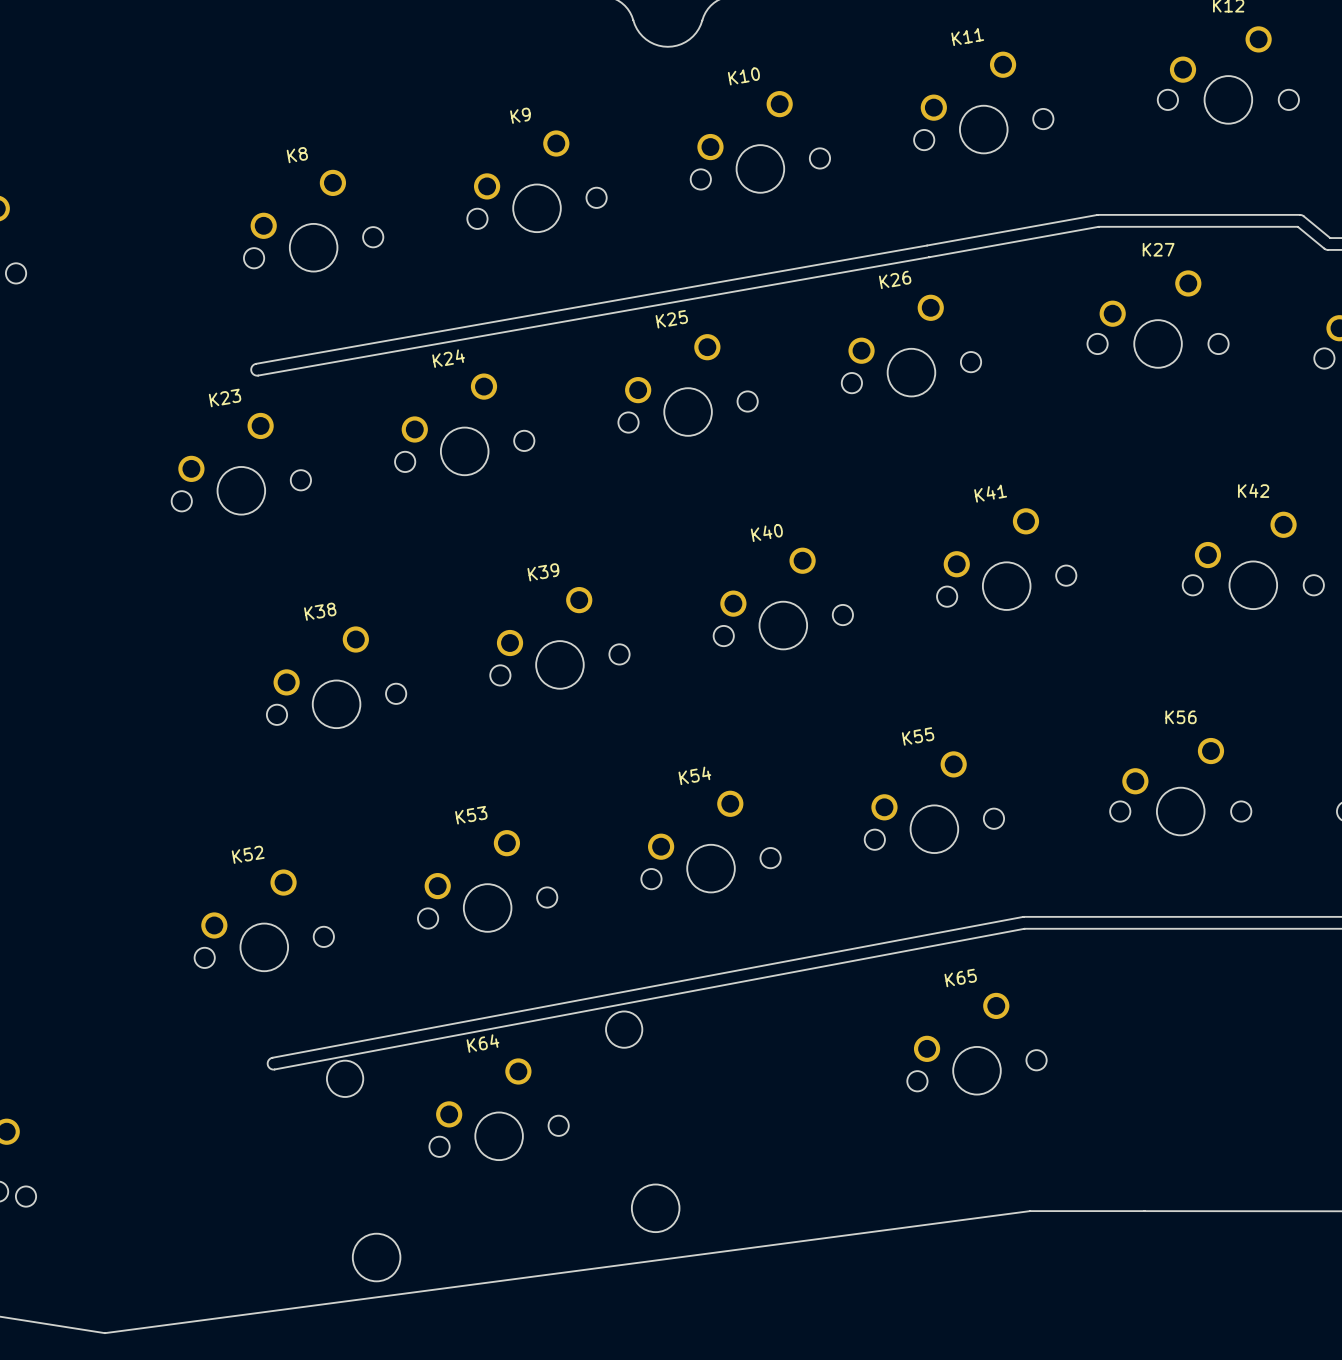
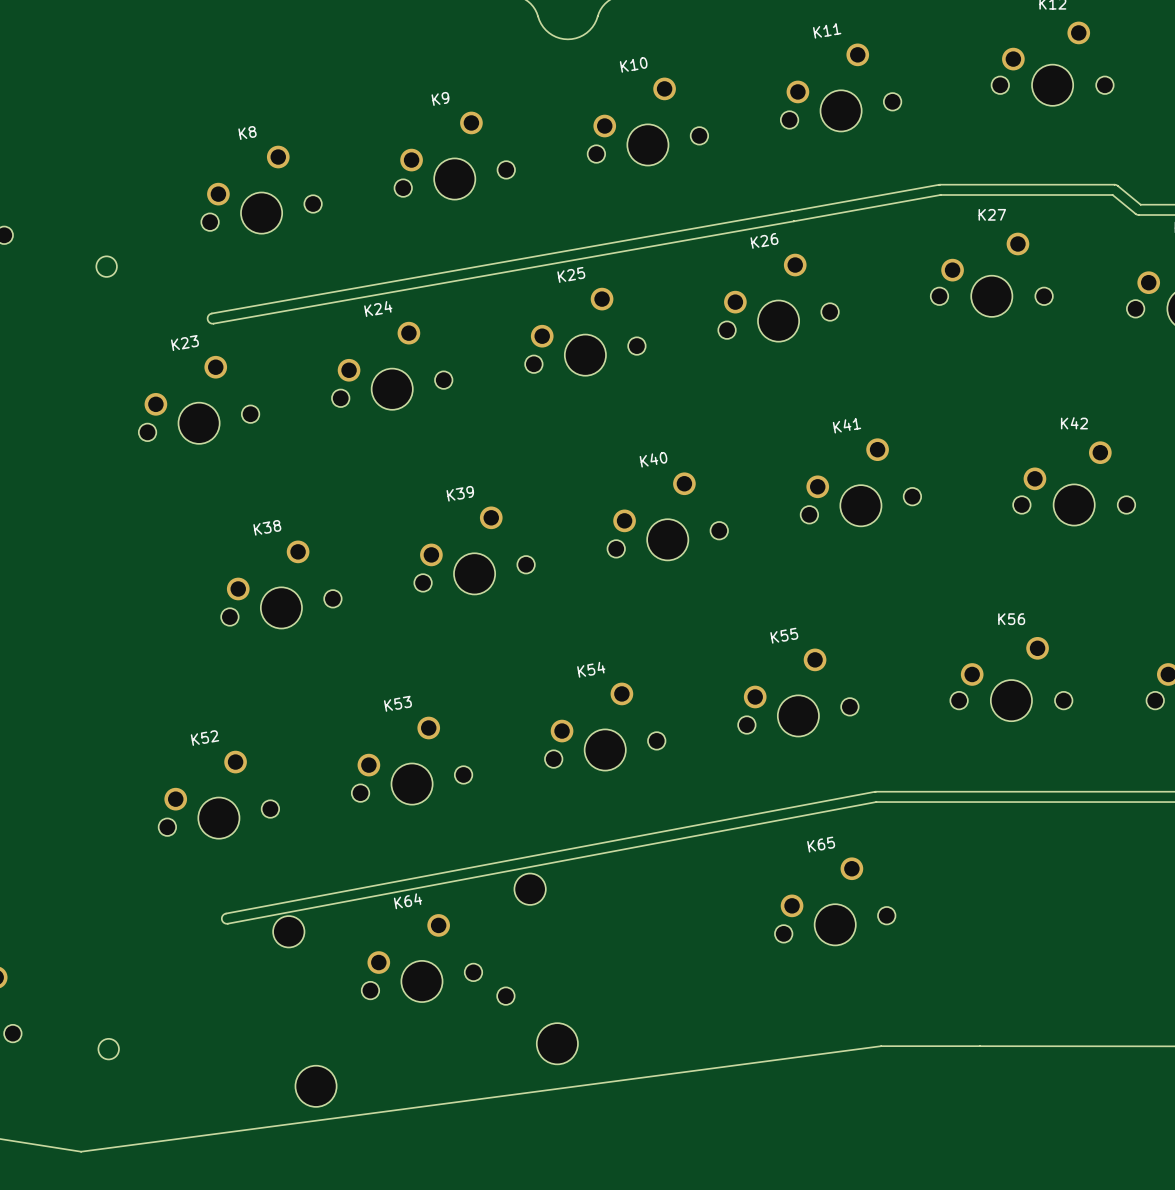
round board edge: none -> [96, 256, 118, 278]
part: none -> (505, 996)
round board edge: none -> [98, 1038, 120, 1060]

